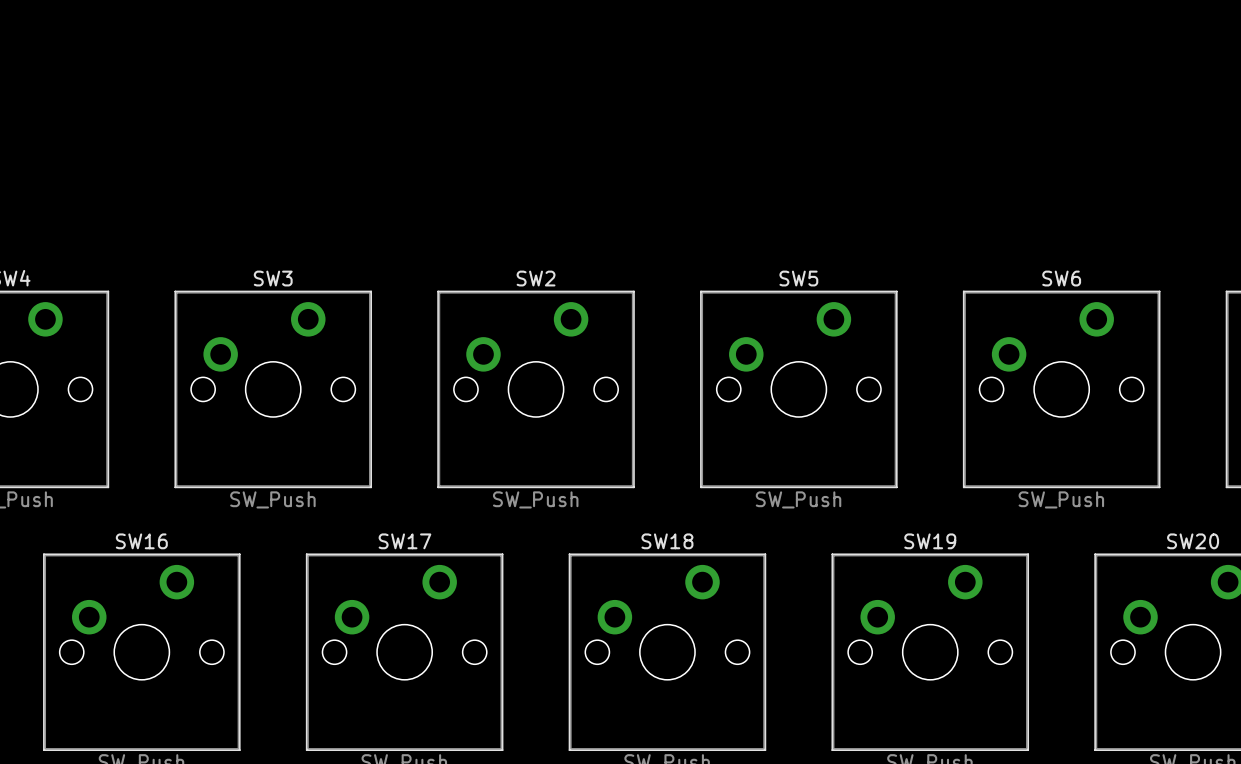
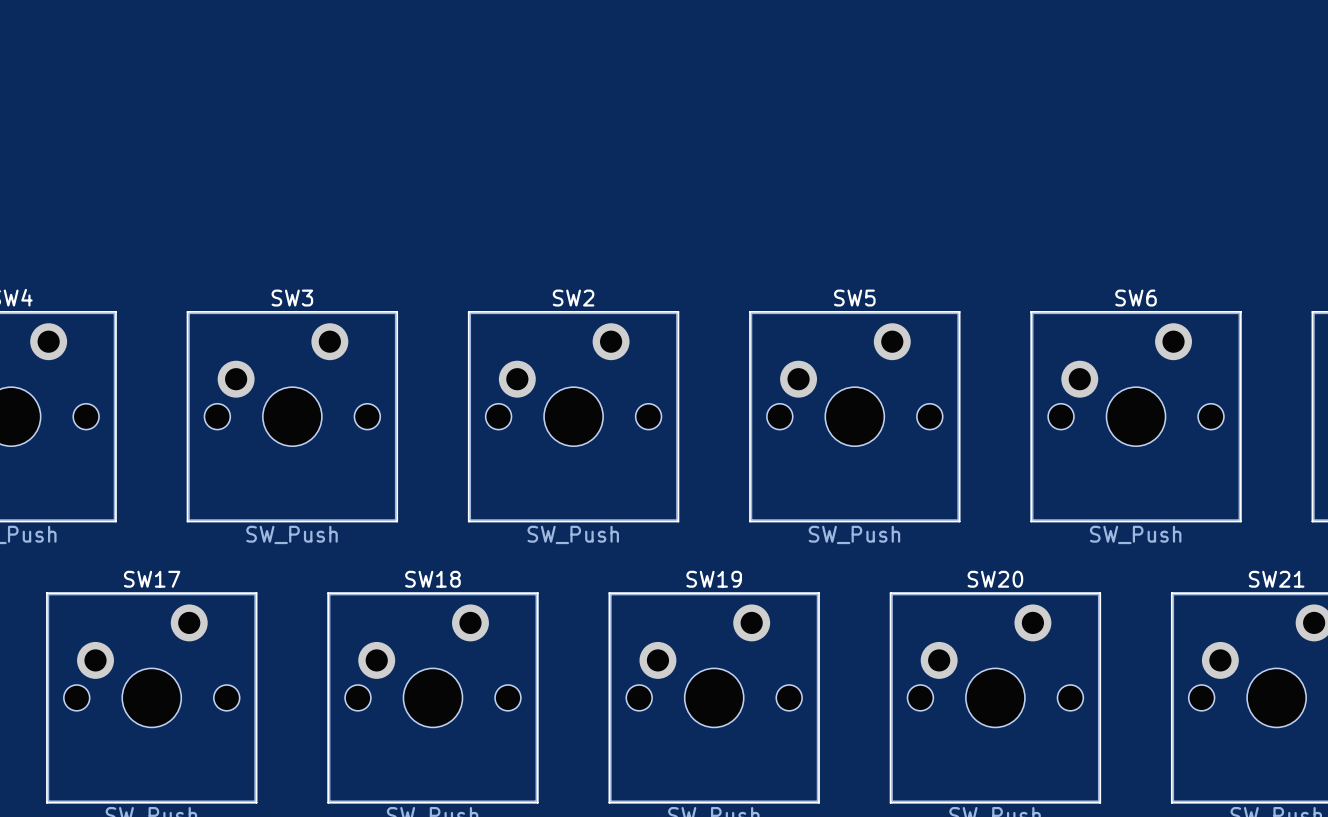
SW16 name: SW16 (141, 541) -> SW17 (152, 579)
SW17 name: SW17 (404, 541) -> SW18 (432, 579)
SW18 name: SW18 (667, 541) -> SW19 (714, 579)
SW19 name: SW19 (930, 541) -> SW20 (995, 579)
SW20 name: SW20 (1193, 541) -> SW21 (1276, 579)

